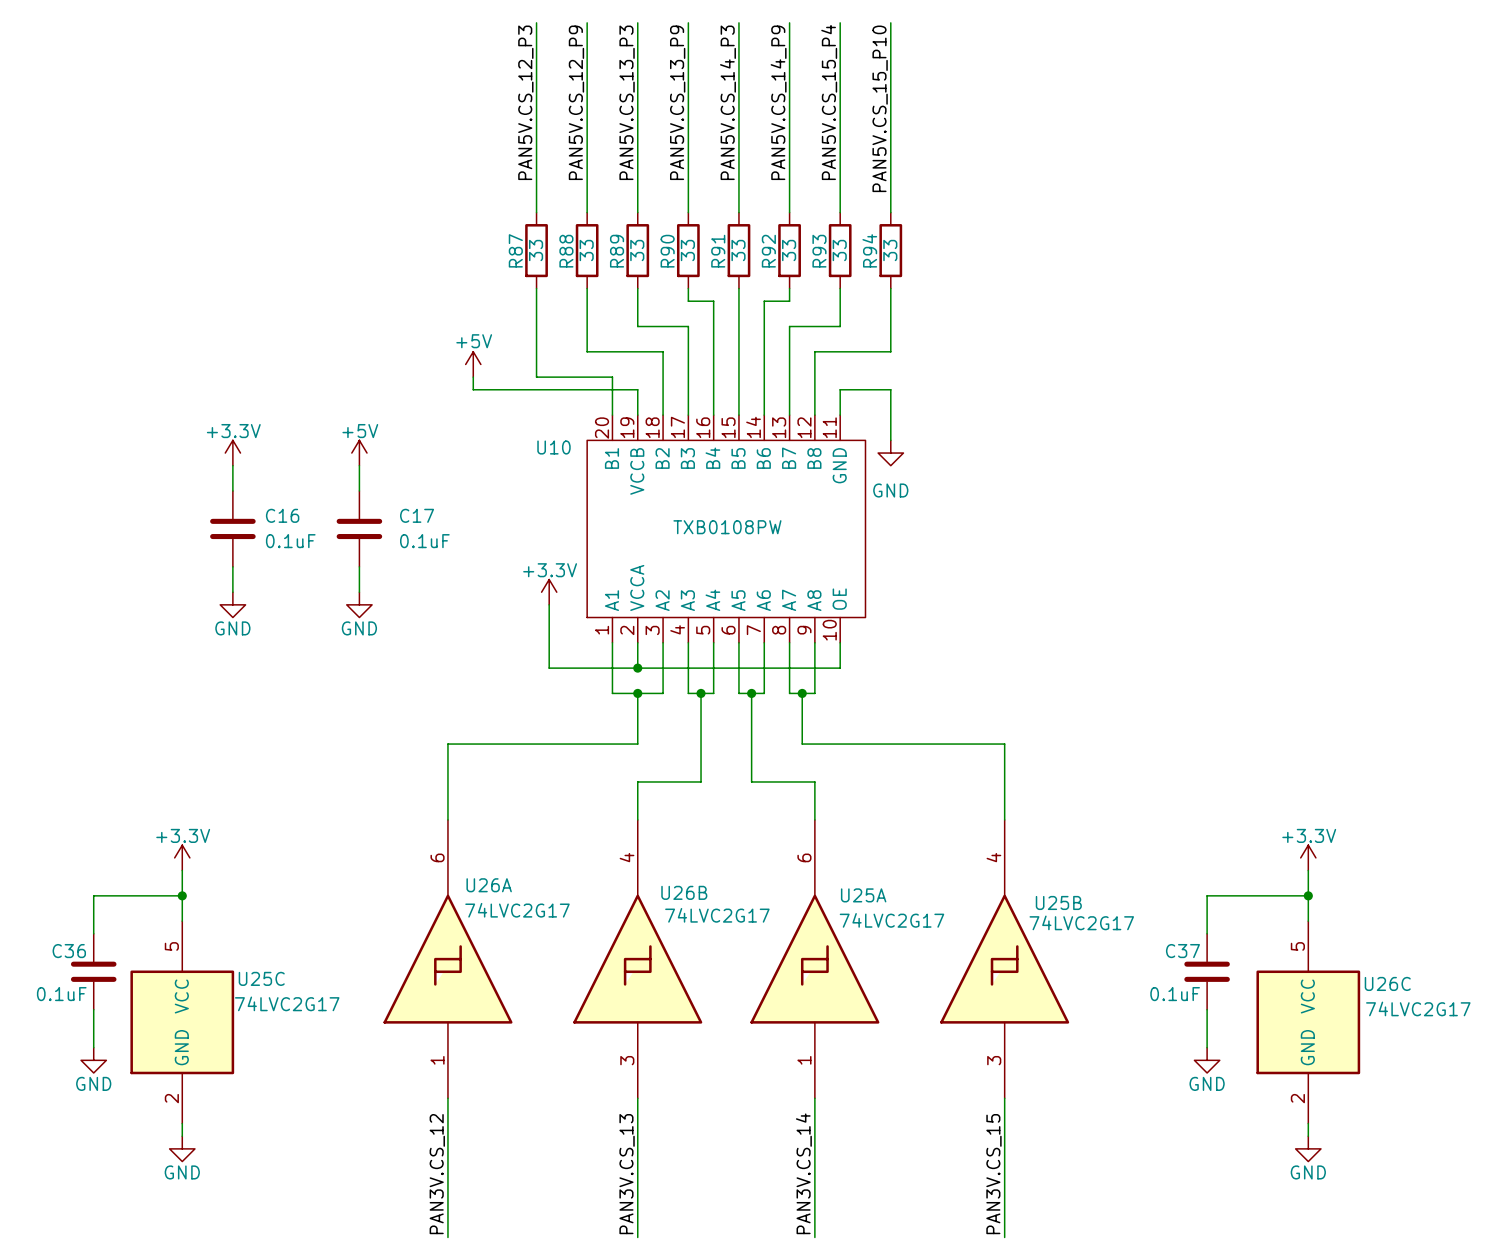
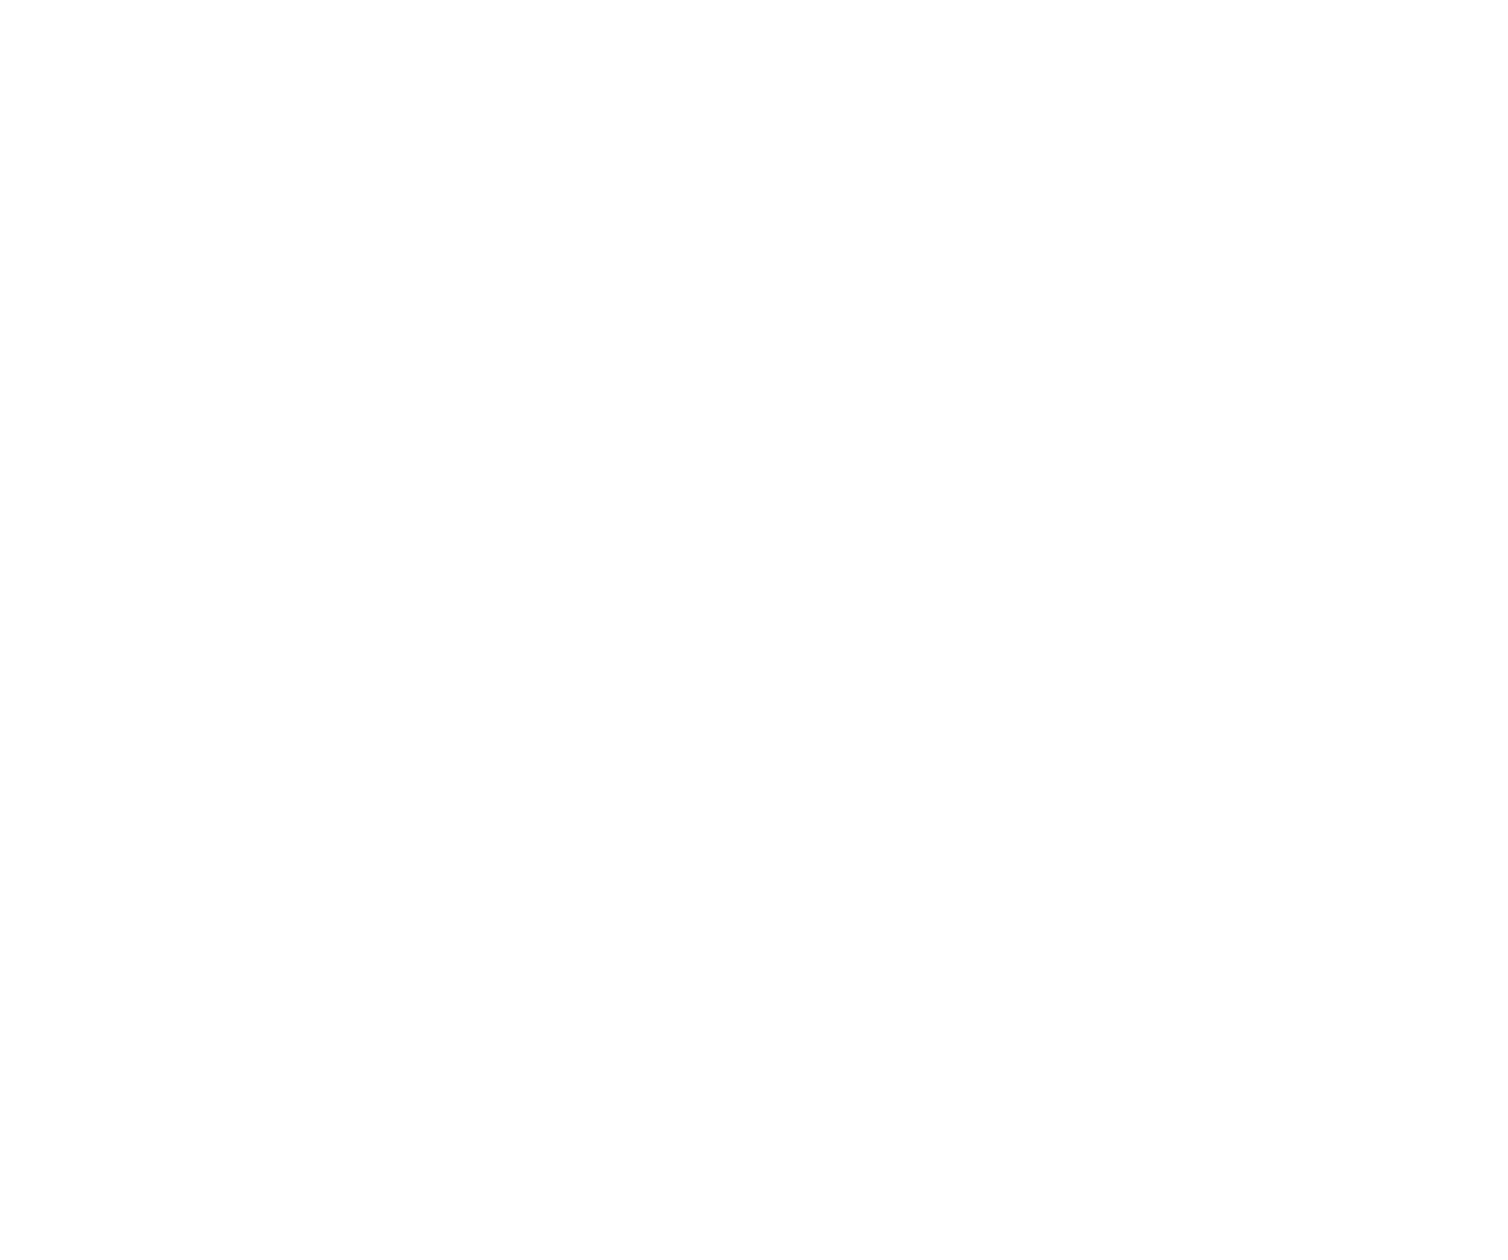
wire: (536, 22) (536, 212) -> none
wire: (587, 22) (587, 212) -> none
wire: (637, 22) (637, 212) -> none
wire: (688, 22) (688, 212) -> none
wire: (738, 22) (738, 212) -> none
wire: (789, 22) (789, 212) -> none
wire: (840, 22) (840, 212) -> none
wire: (890, 22) (890, 212) -> none
label: PAN5V.CS_12_P3 (525, 102) -> none
label: PAN5V.CS_12_P9 (576, 102) -> none
label: PAN5V.CS_13_P3 (627, 102) -> none
label: PAN5V.CS_13_P9 (677, 102) -> none
label: PAN5V.CS_14_P3 (727, 102) -> none
label: PAN5V.CS_14_P9 (778, 102) -> none
label: PAN5V.CS_15_P4 (829, 102) -> none
label: PAN5V.CS_15_P10 (880, 108) -> none
R87: 33 (536, 250) -> none
R88: 33 (587, 250) -> none
R89: 33 (637, 250) -> none
R90: 33 (688, 250) -> none
R91: 33 (738, 250) -> none
R92: 33 (789, 250) -> none
R93: 33 (840, 250) -> none
R94: 33 (890, 250) -> none
wire: (536, 288) (536, 377) (612, 377) (612, 415) -> none
wire: (587, 288) (587, 351) (663, 351) (663, 415) -> none
wire: (637, 288) (637, 326) (688, 326) (688, 415) -> none
wire: (688, 288) (688, 301) (713, 301) (713, 415) -> none
wire: (738, 288) (738, 415) -> none
wire: (789, 288) (789, 301) (764, 301) (764, 415) -> none
wire: (840, 288) (840, 326) (789, 326) (789, 415) -> none
wire: (890, 288) (890, 351) (814, 351) (814, 415) -> none
power symbol: +5V (473, 364) -> none
wire: (473, 377) (473, 389) (637, 389) (637, 415) -> none
wire: (840, 415) (840, 389) (890, 389) (890, 440) -> none
power symbol: +3.3V (232, 453) -> none
power symbol: +5V (359, 453) -> none
power symbol: GND (890, 453) -> none
wire: (232, 465) (232, 490) -> none
wire: (359, 465) (359, 490) -> none
C16: 0.1uF (232, 528) -> none
C17: 0.1uF (359, 528) -> none
U10: TXB0108PW (726, 528) -> none
wire: (232, 566) (232, 592) -> none
wire: (359, 566) (359, 592) -> none
power symbol: +3.3V (549, 592) -> none
power symbol: GND (232, 604) -> none
power symbol: GND (359, 604) -> none
wire: (549, 604) (549, 668) (840, 668) (840, 642) -> none
wire: (612, 642) (612, 693) (663, 693) (663, 642) -> none
wire: (637, 642) (637, 668) -> none
wire: (688, 642) (688, 693) (713, 693) (713, 642) -> none
wire: (738, 642) (738, 693) (764, 693) (764, 642) -> none
wire: (789, 642) (789, 693) (814, 693) (814, 642) -> none
junction: (637, 668) -> none
wire: (637, 693) (637, 744) (447, 744) (447, 819) -> none
junction: (637, 693) -> none
wire: (701, 693) (701, 781) (637, 781) (637, 819) -> none
junction: (701, 693) -> none
wire: (751, 693) (751, 781) (814, 781) (814, 819) -> none
junction: (751, 693) -> none
wire: (802, 693) (802, 744) (1004, 744) (1004, 819) -> none
junction: (802, 693) -> none
power symbol: +3.3V (182, 857) -> none
power symbol: +3.3V (1308, 857) -> none
wire: (182, 870) (182, 921) -> none
wire: (1308, 870) (1308, 921) -> none
wire: (182, 895) (93, 895) (93, 933) -> none
junction: (182, 895) -> none
wire: (1308, 895) (1207, 895) (1207, 933) -> none
junction: (1308, 895) -> none
U26A: 74LVC2G17 (447, 959) -> none
U26B: 74LVC2G17 (637, 959) -> none
U25A: 74LVC2G17 (814, 959) -> none
U25B: 74LVC2G17 (1004, 959) -> none
C36: 0.1uF (93, 971) -> none
C37: 0.1uF (1207, 971) -> none
wire: (93, 1009) (93, 1047) -> none
wire: (1207, 1009) (1207, 1047) -> none
U25C: 74LVC2G17 (182, 1022) -> none
U26C: 74LVC2G17 (1308, 1022) -> none
power symbol: GND (93, 1060) -> none
power symbol: GND (1207, 1060) -> none
wire: (447, 1098) (447, 1237) -> none
wire: (637, 1098) (637, 1237) -> none
wire: (814, 1098) (814, 1237) -> none
wire: (1004, 1098) (1004, 1237) -> none
wire: (182, 1123) (182, 1136) -> none
wire: (1308, 1123) (1308, 1136) -> none
power symbol: GND (182, 1148) -> none
power symbol: GND (1308, 1148) -> none
label: PAN3V.CS_14 (803, 1173) -> none
label: PAN3V.CS_12 (437, 1174) -> none
label: PAN3V.CS_13 (627, 1174) -> none
label: PAN3V.CS_15 (993, 1174) -> none

